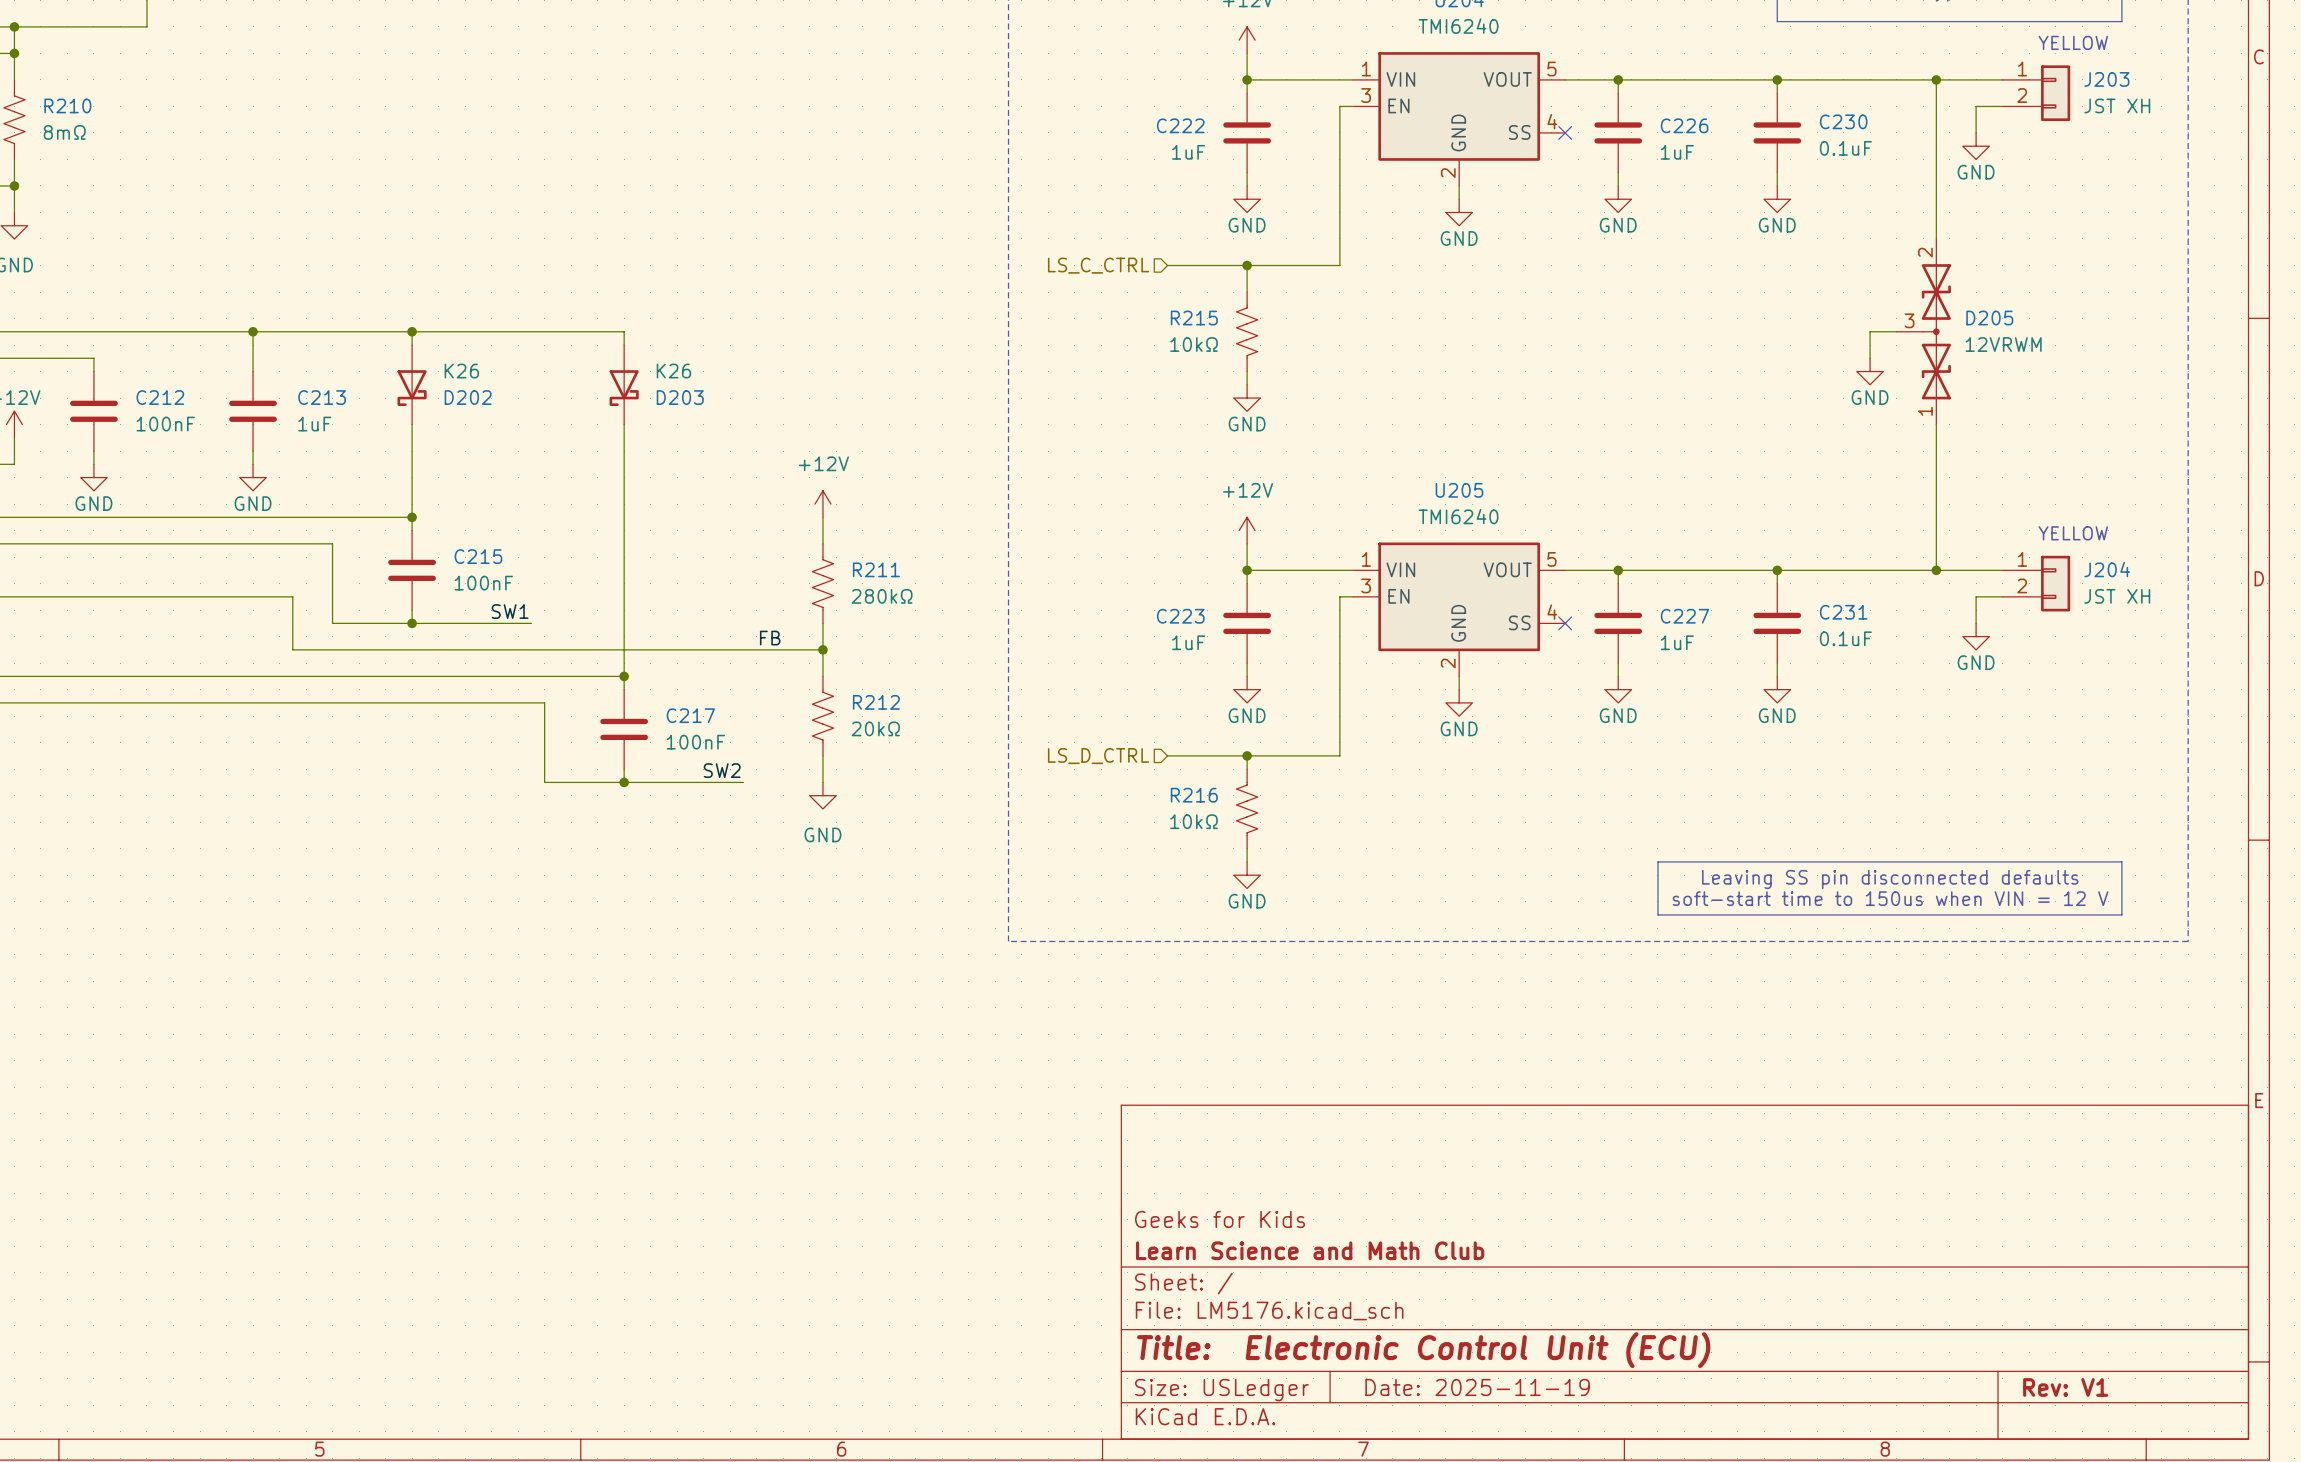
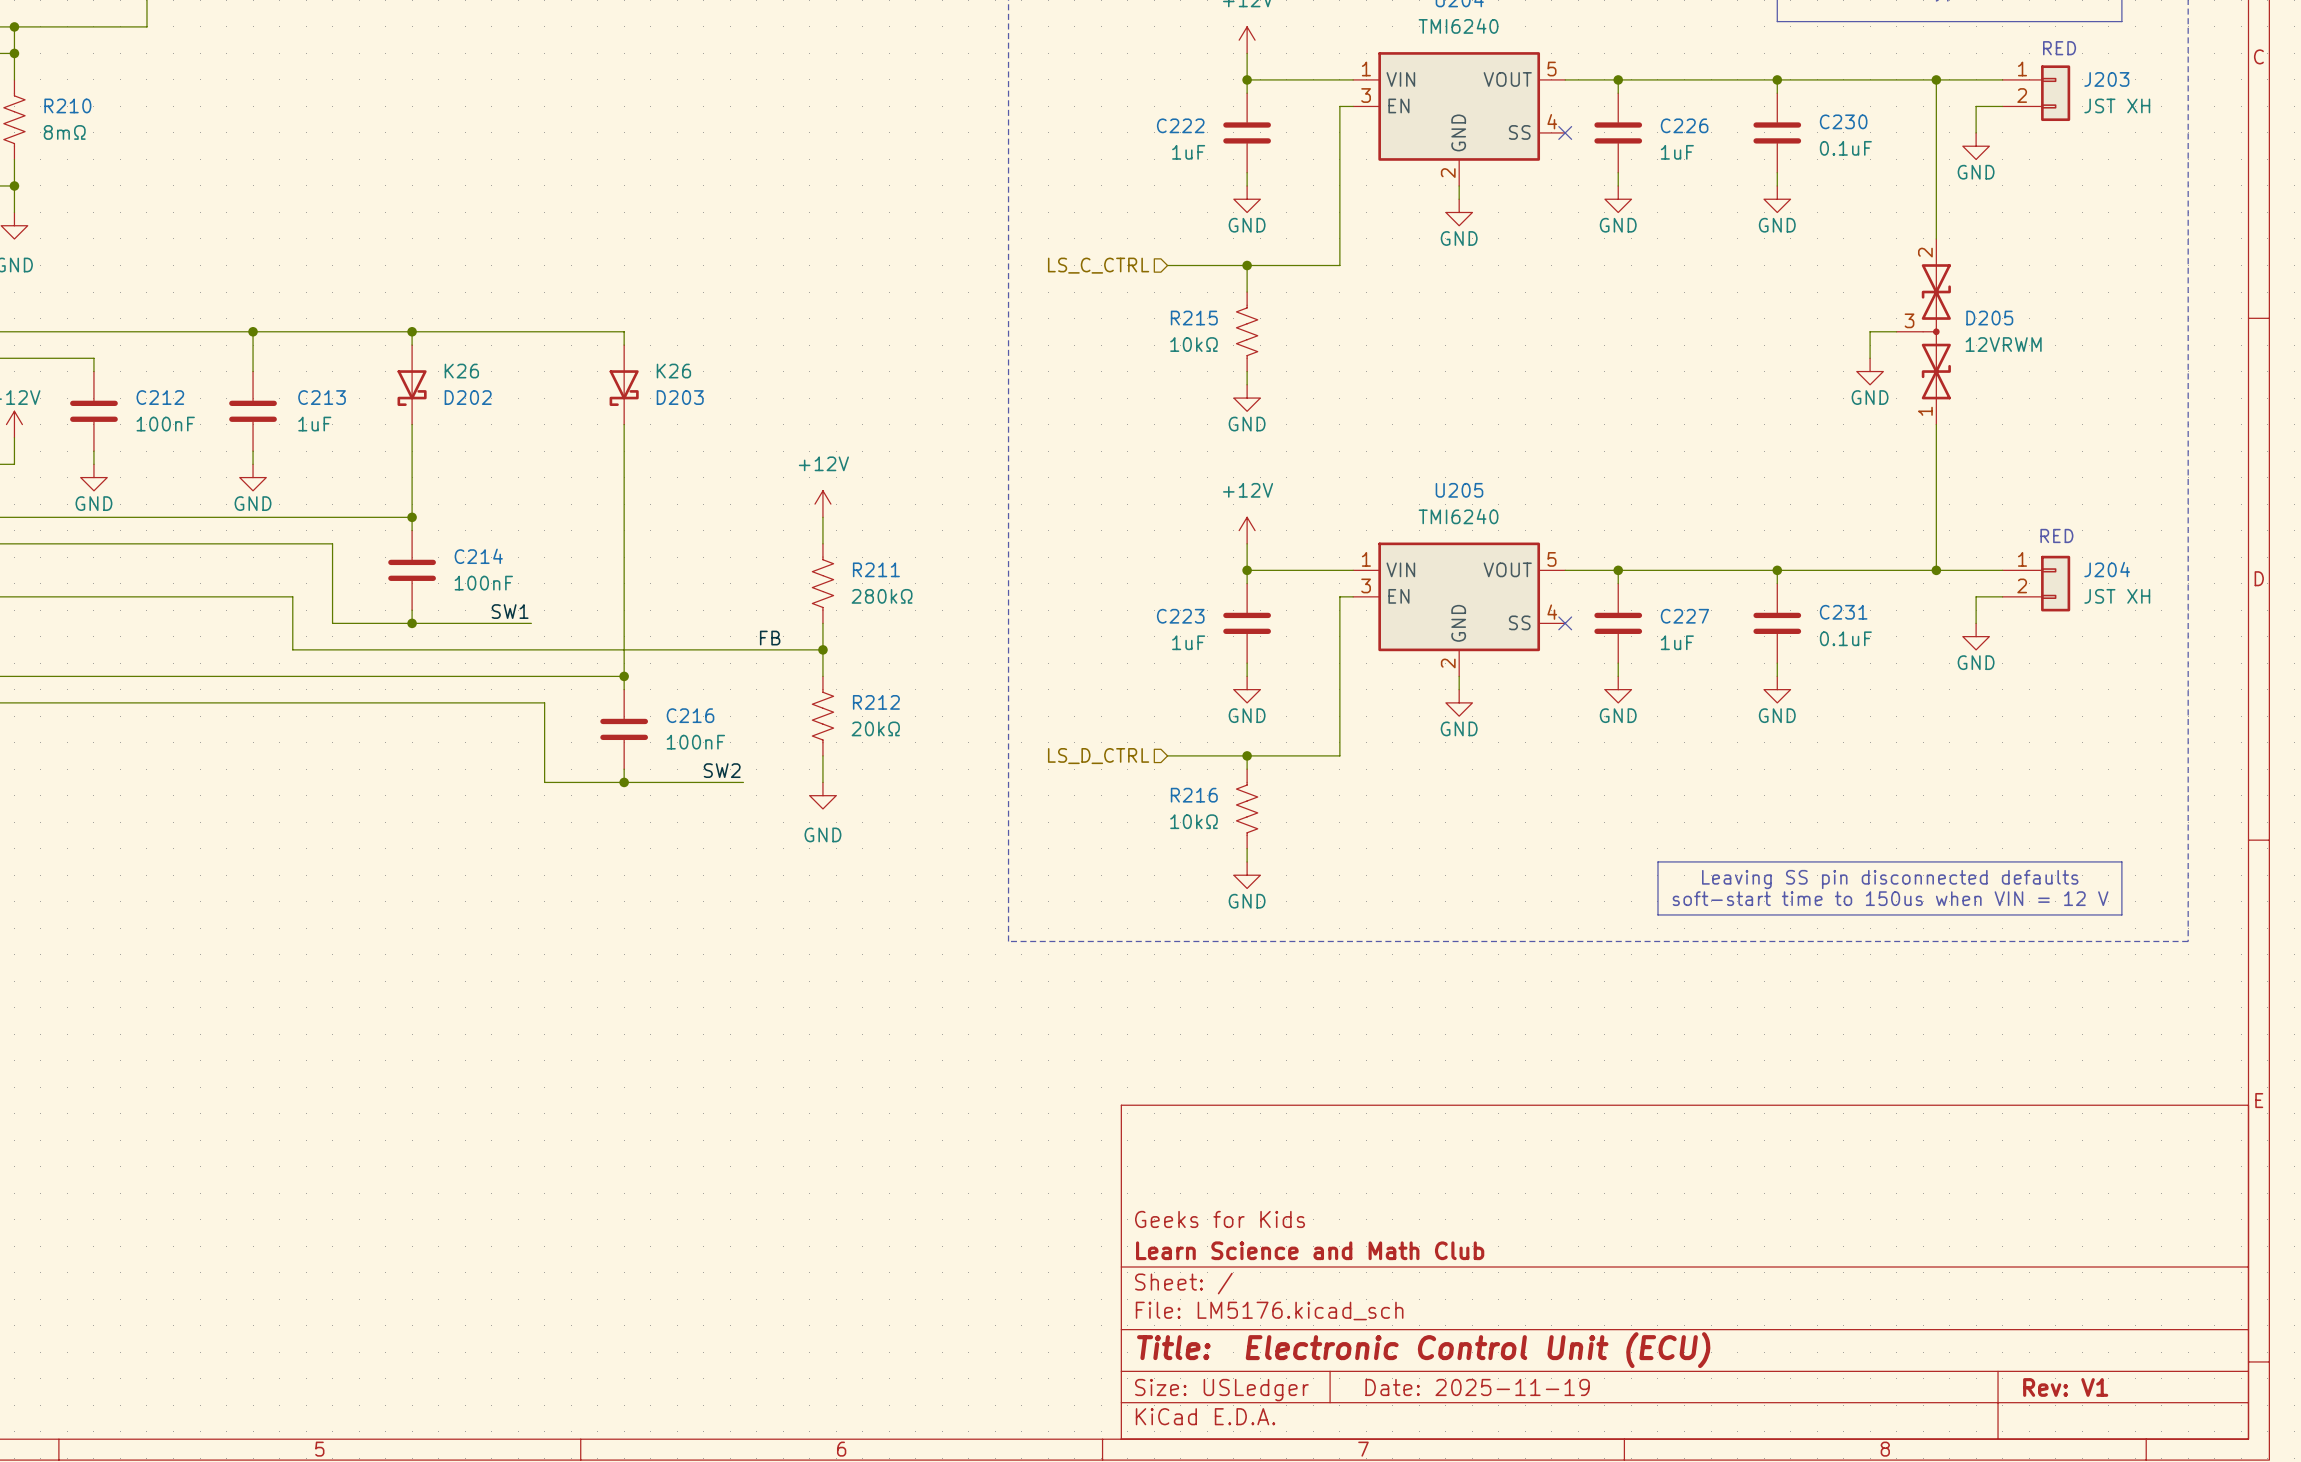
text: YELLOW (2073, 42) -> RED (2059, 48)
text: YELLOW (2073, 533) -> RED (2056, 535)
C215 name: C215 (478, 556) -> C214 (478, 556)
C217 name: C217 (690, 715) -> C216 (690, 715)

